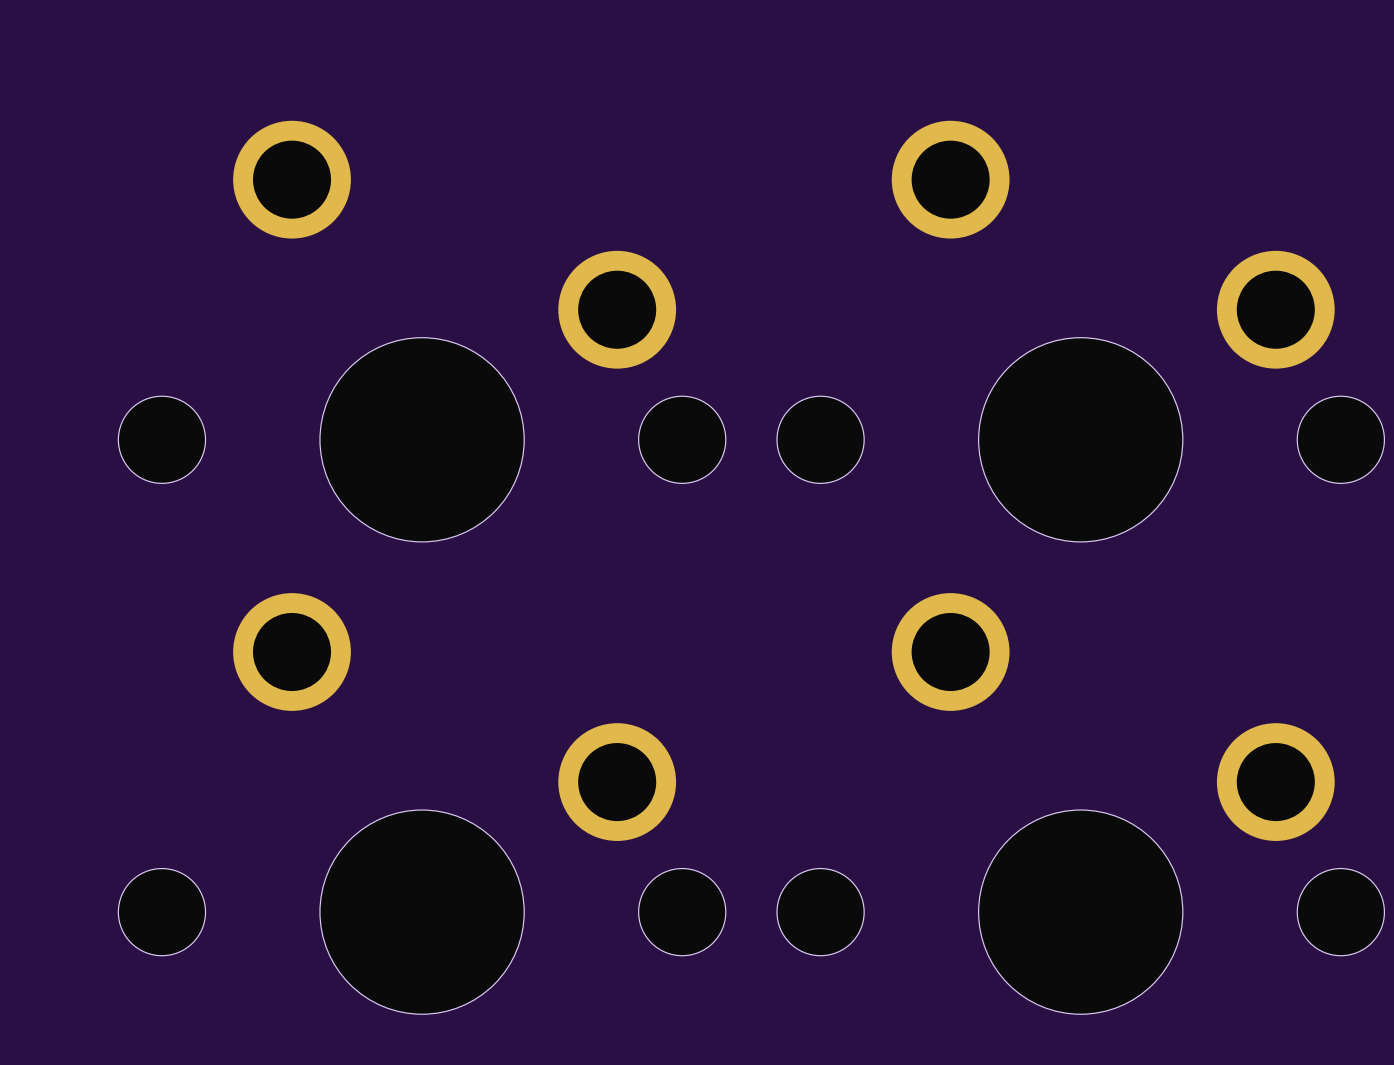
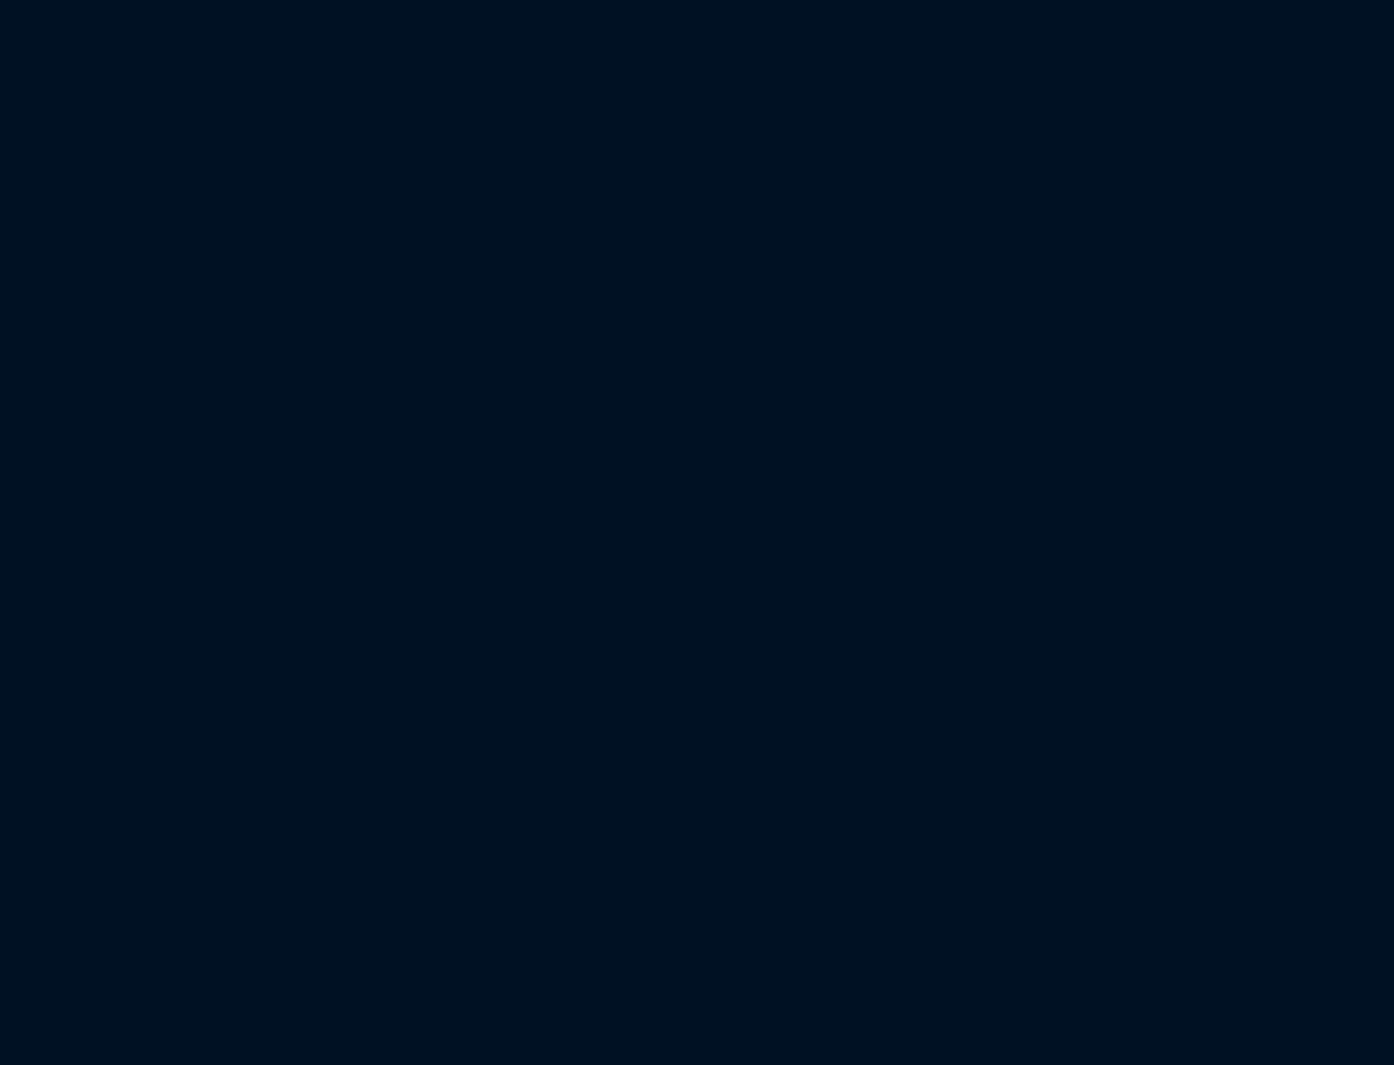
part: (422, 331) -> none
part: (1080, 331) -> none
part: (422, 803) -> none
part: (1080, 803) -> none

